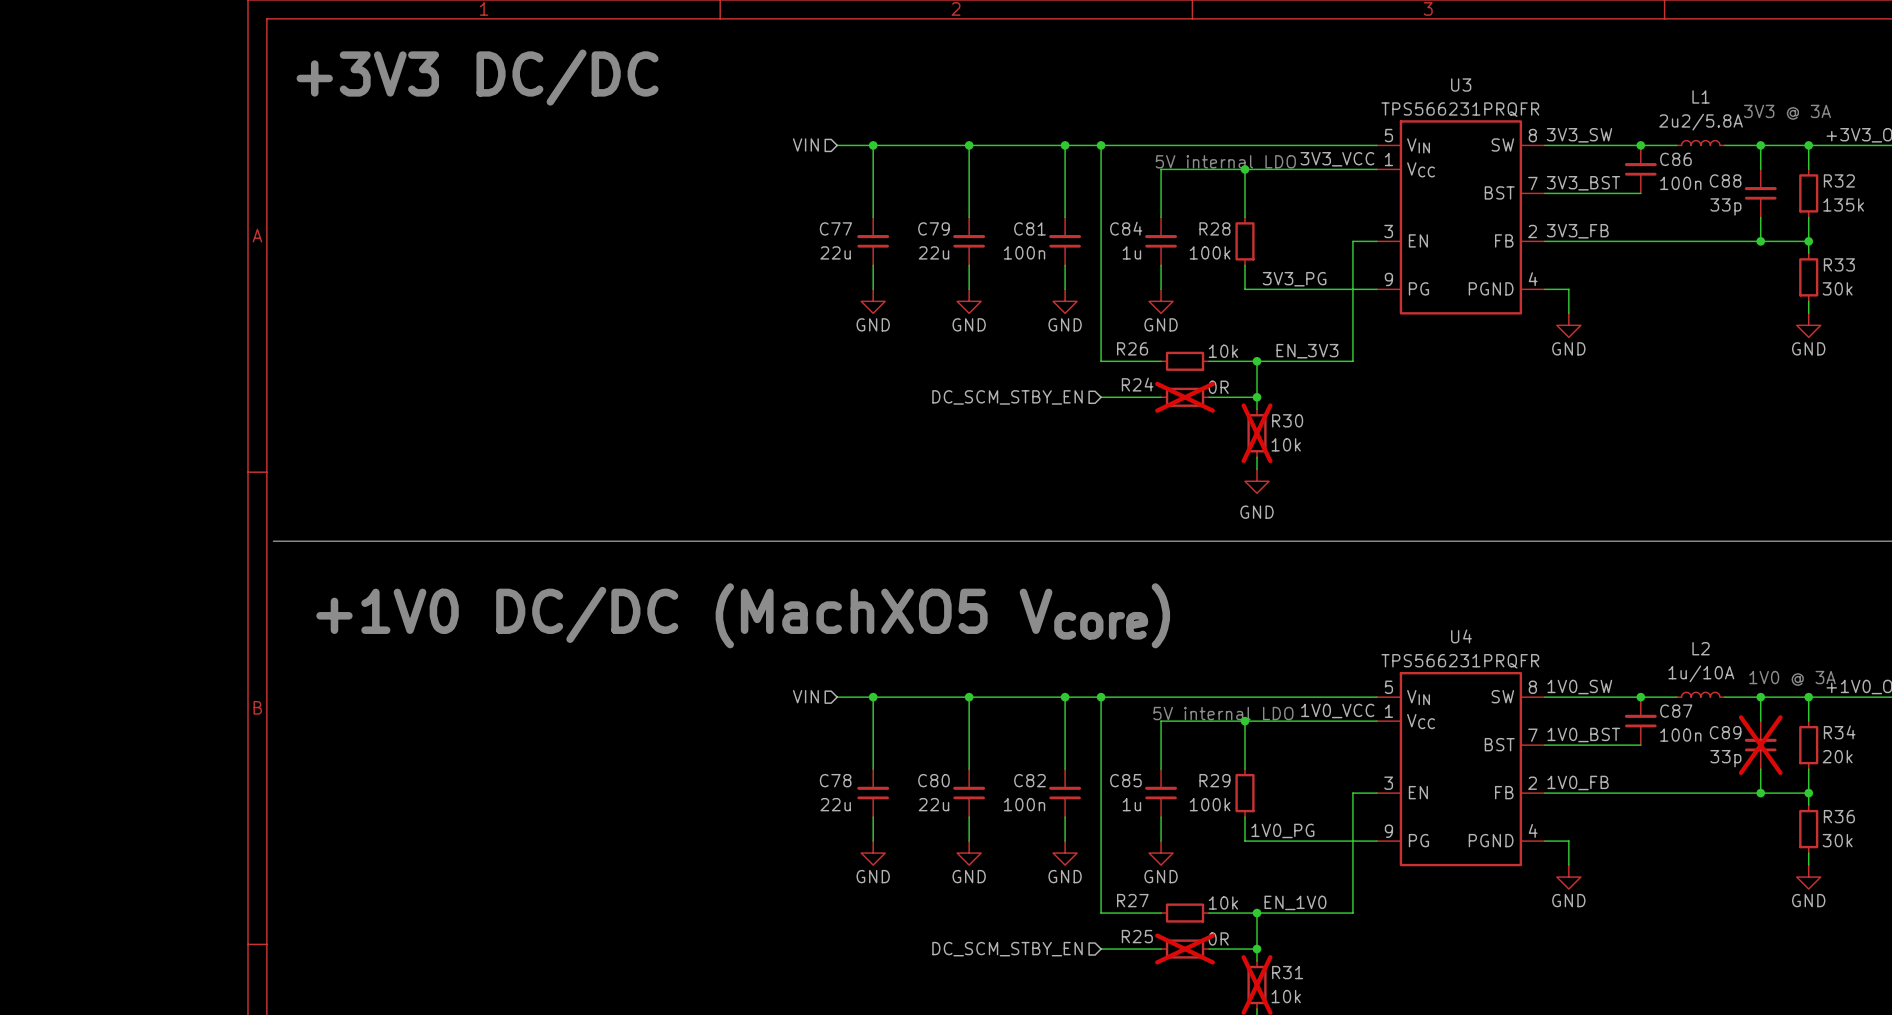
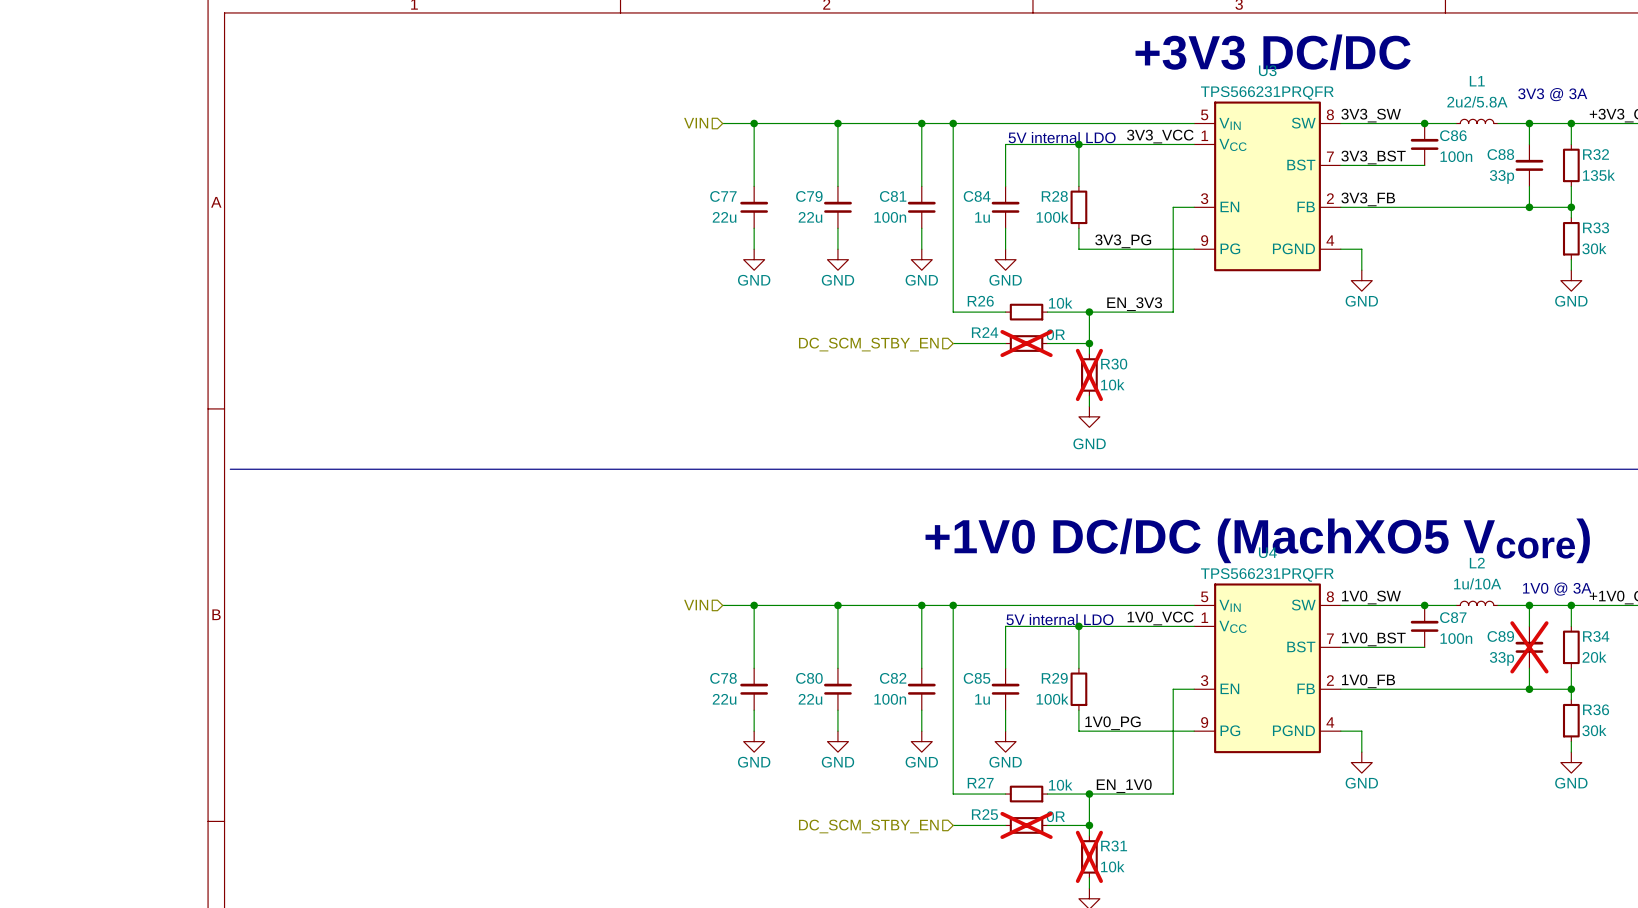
text: none -> +3V3 DC/DC (1273, 52)
text: +3V3 DC/DC (477, 77) -> none
text: +1V0 DC/DC (MachXO5 Vcore) (743, 615) -> none
text: none -> +1V0 DC/DC (MachXO5 Vcore) (1257, 540)

